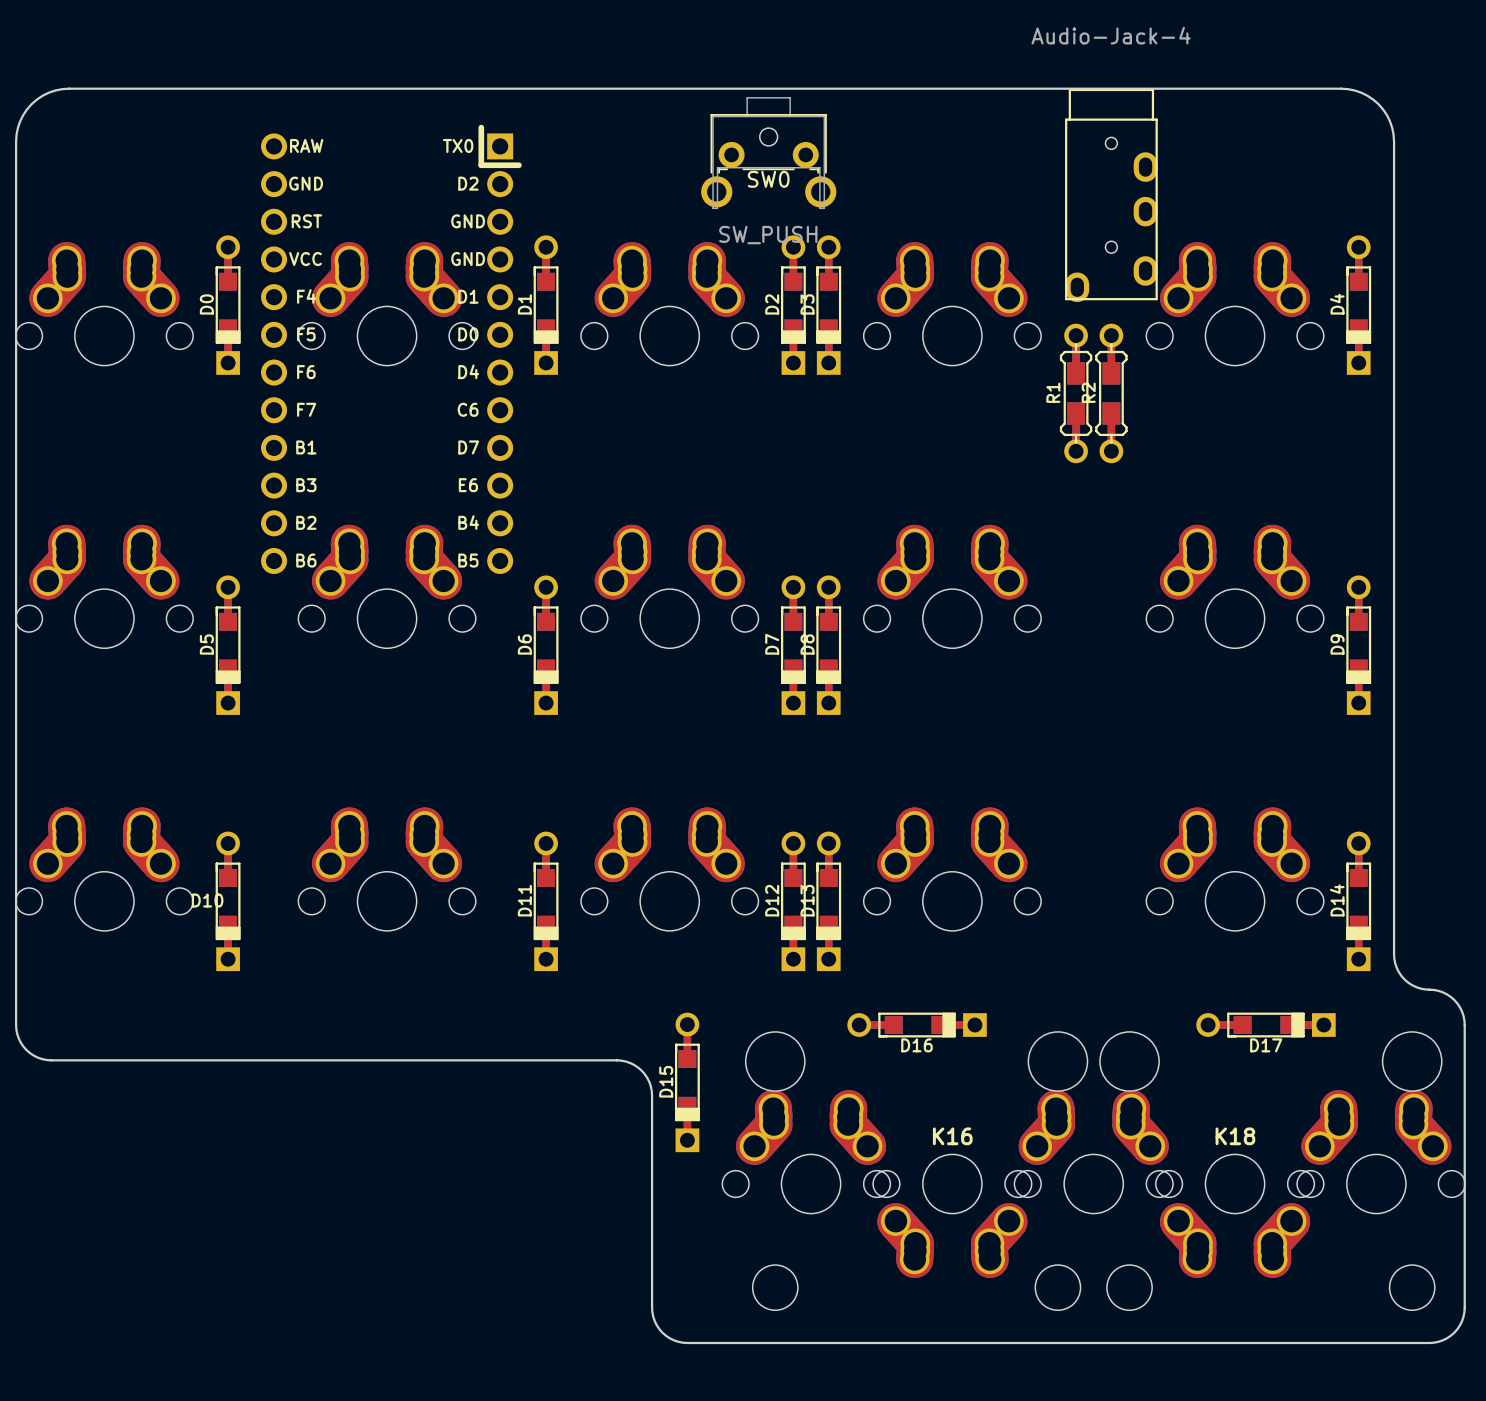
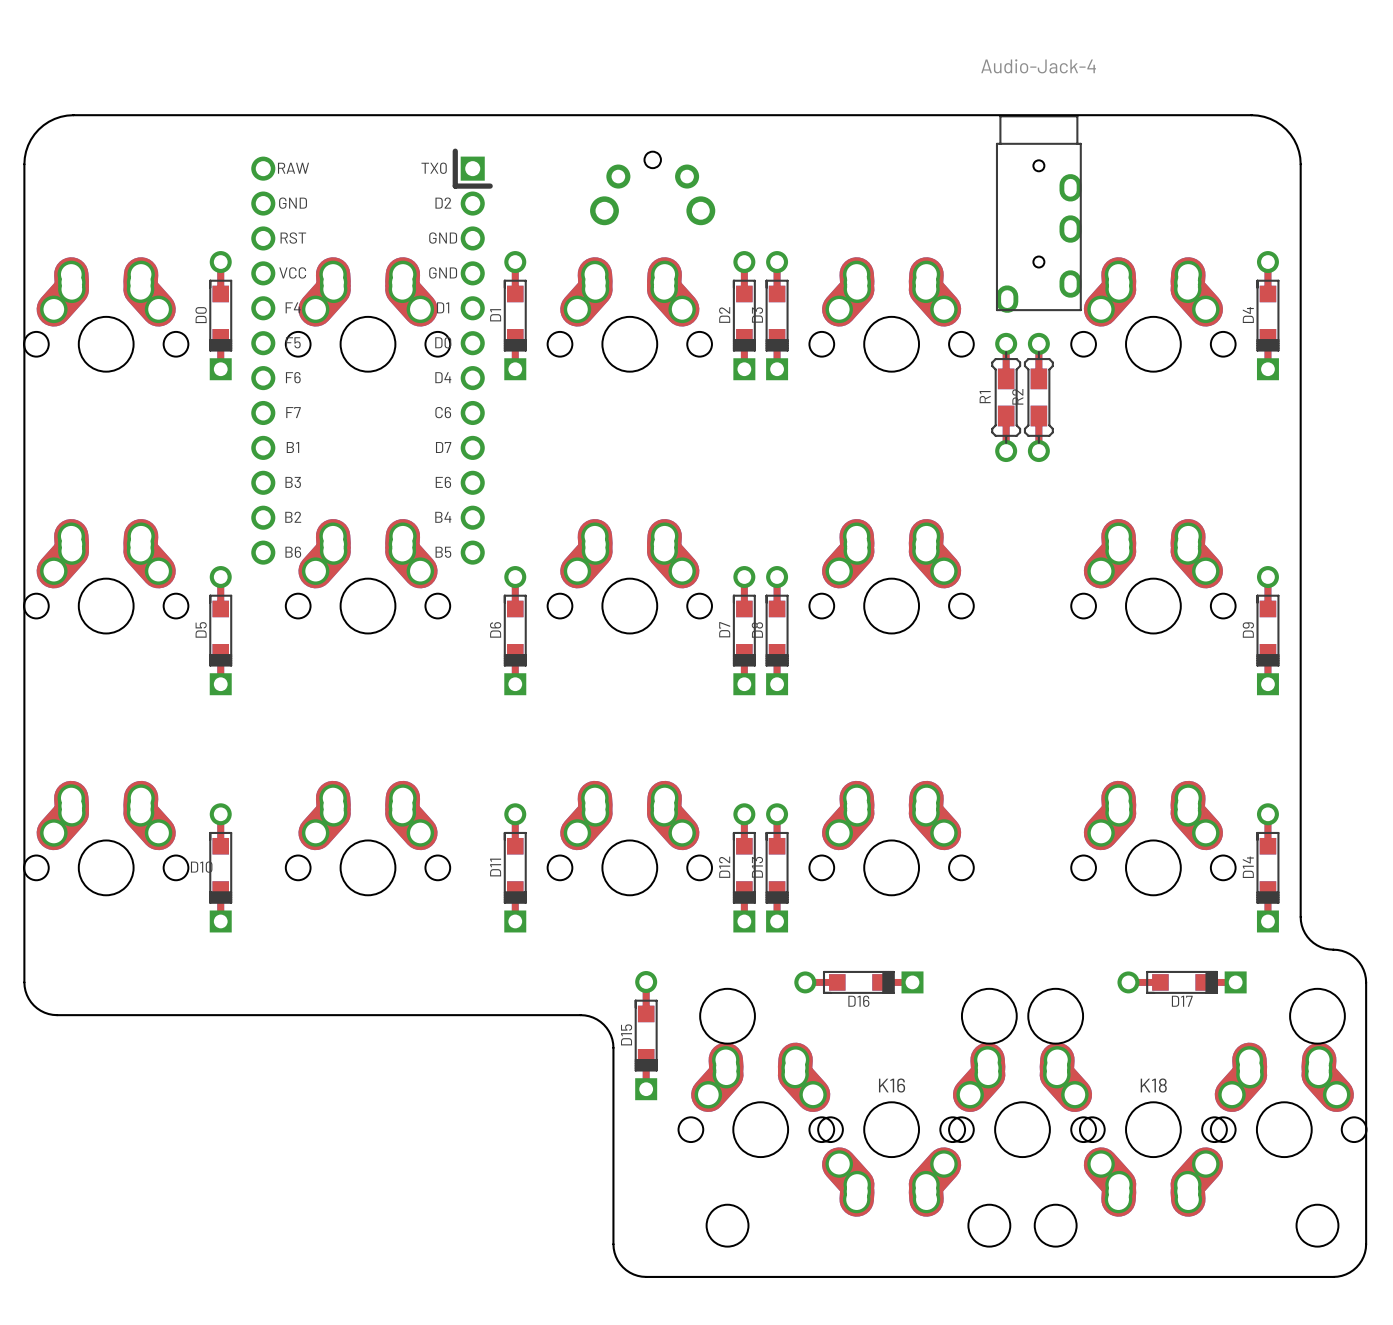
SW0 side: top (768, 153) -> bottom (652, 188)

